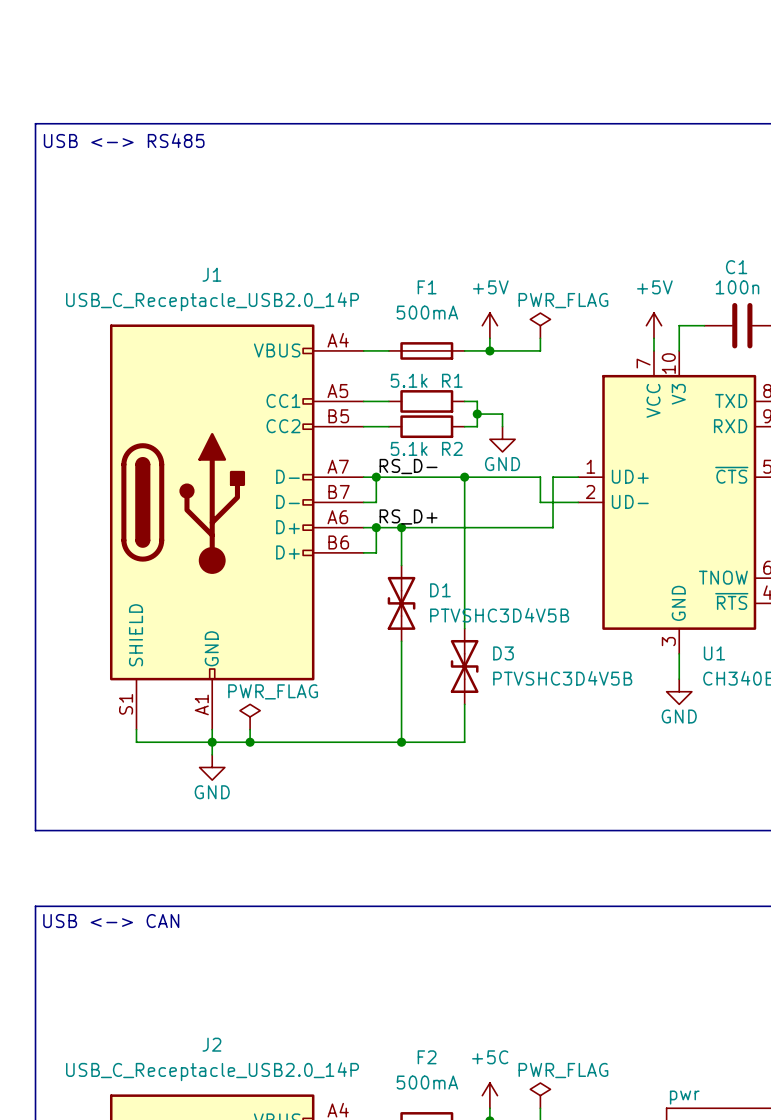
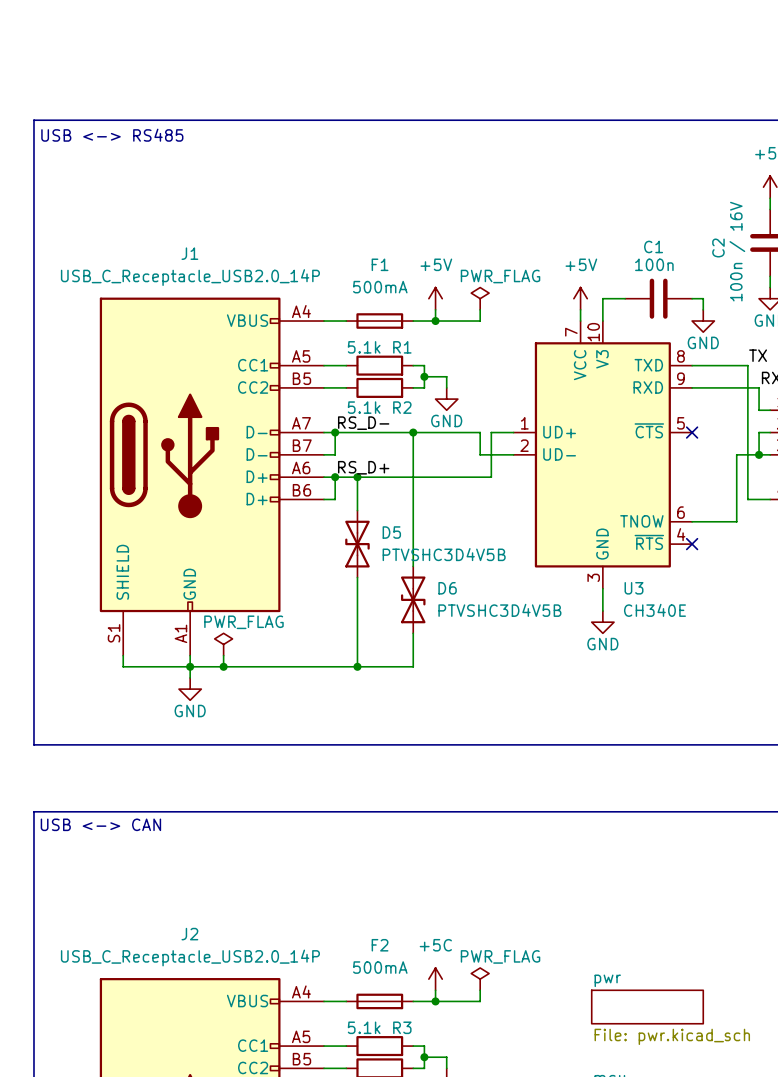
D1 name: D1 (440, 590) -> D5 (391, 532)
D3 name: D3 (503, 653) -> D6 (447, 588)
U1 name: U1 (714, 653) -> U3 (634, 588)

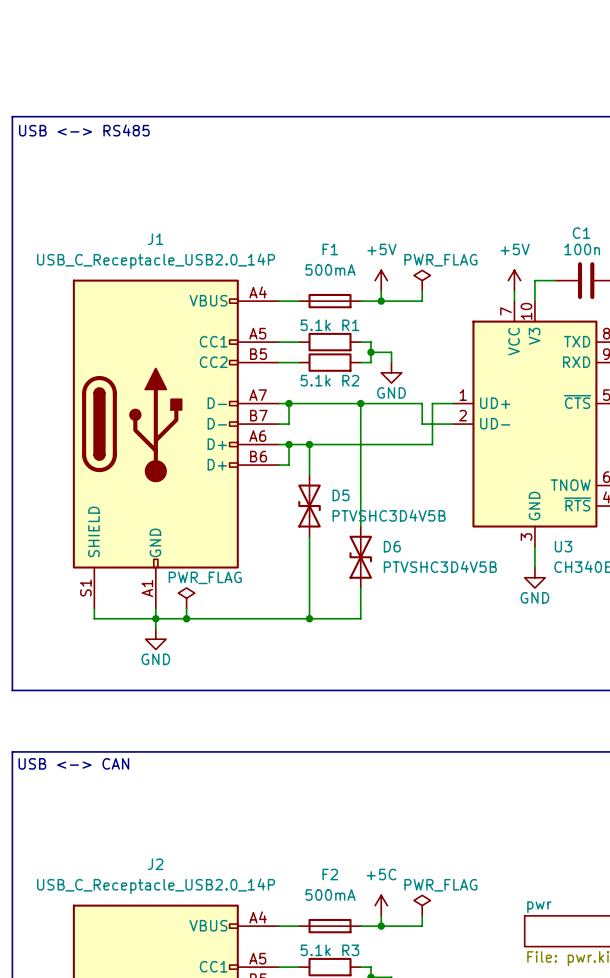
label: RS_D- (363, 423) -> none
label: RS_D+ (363, 467) -> none

